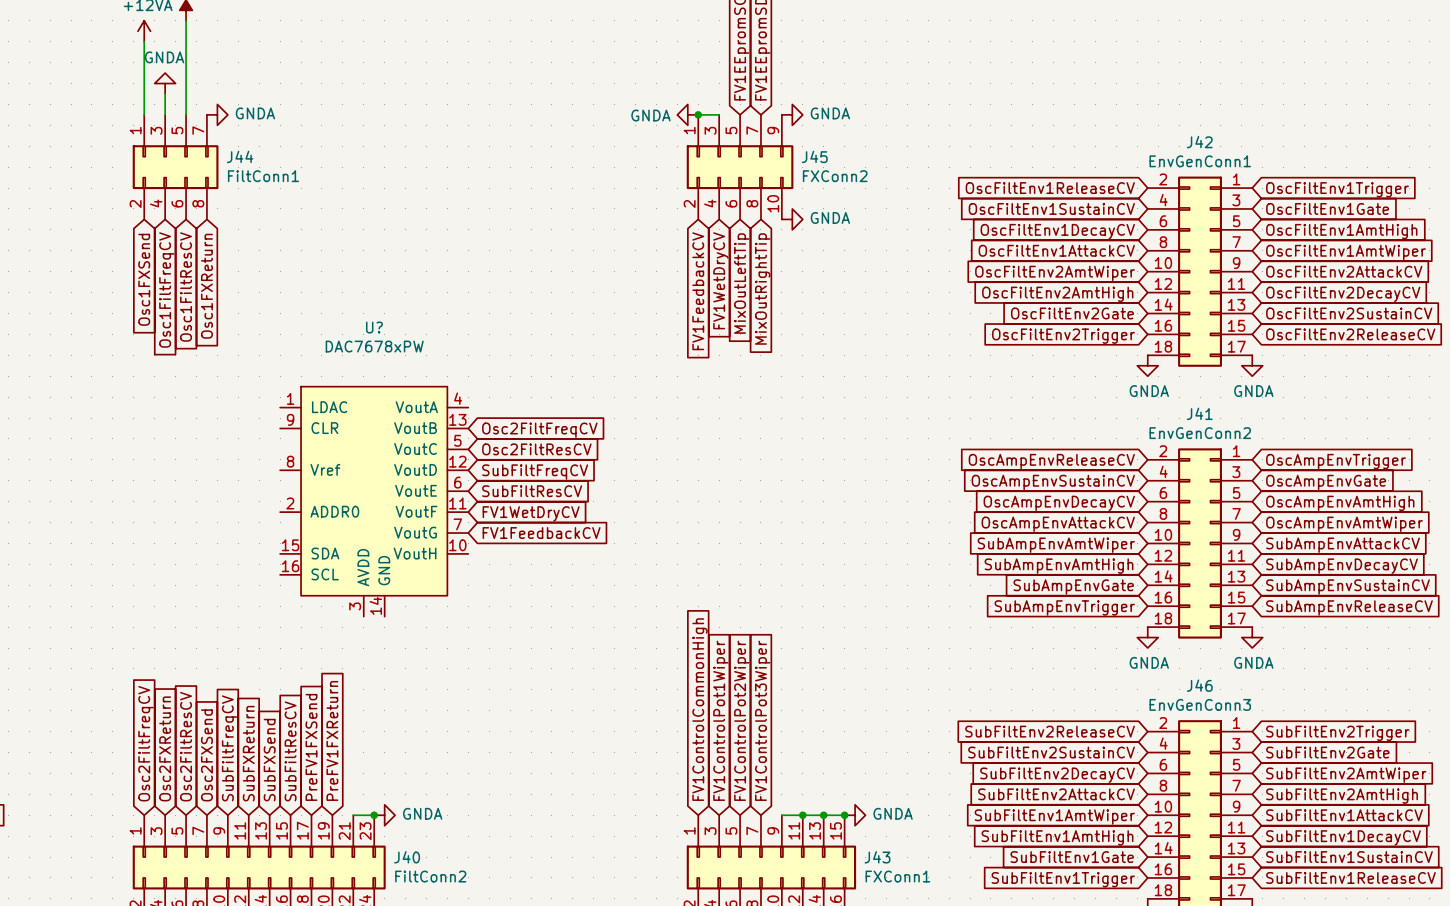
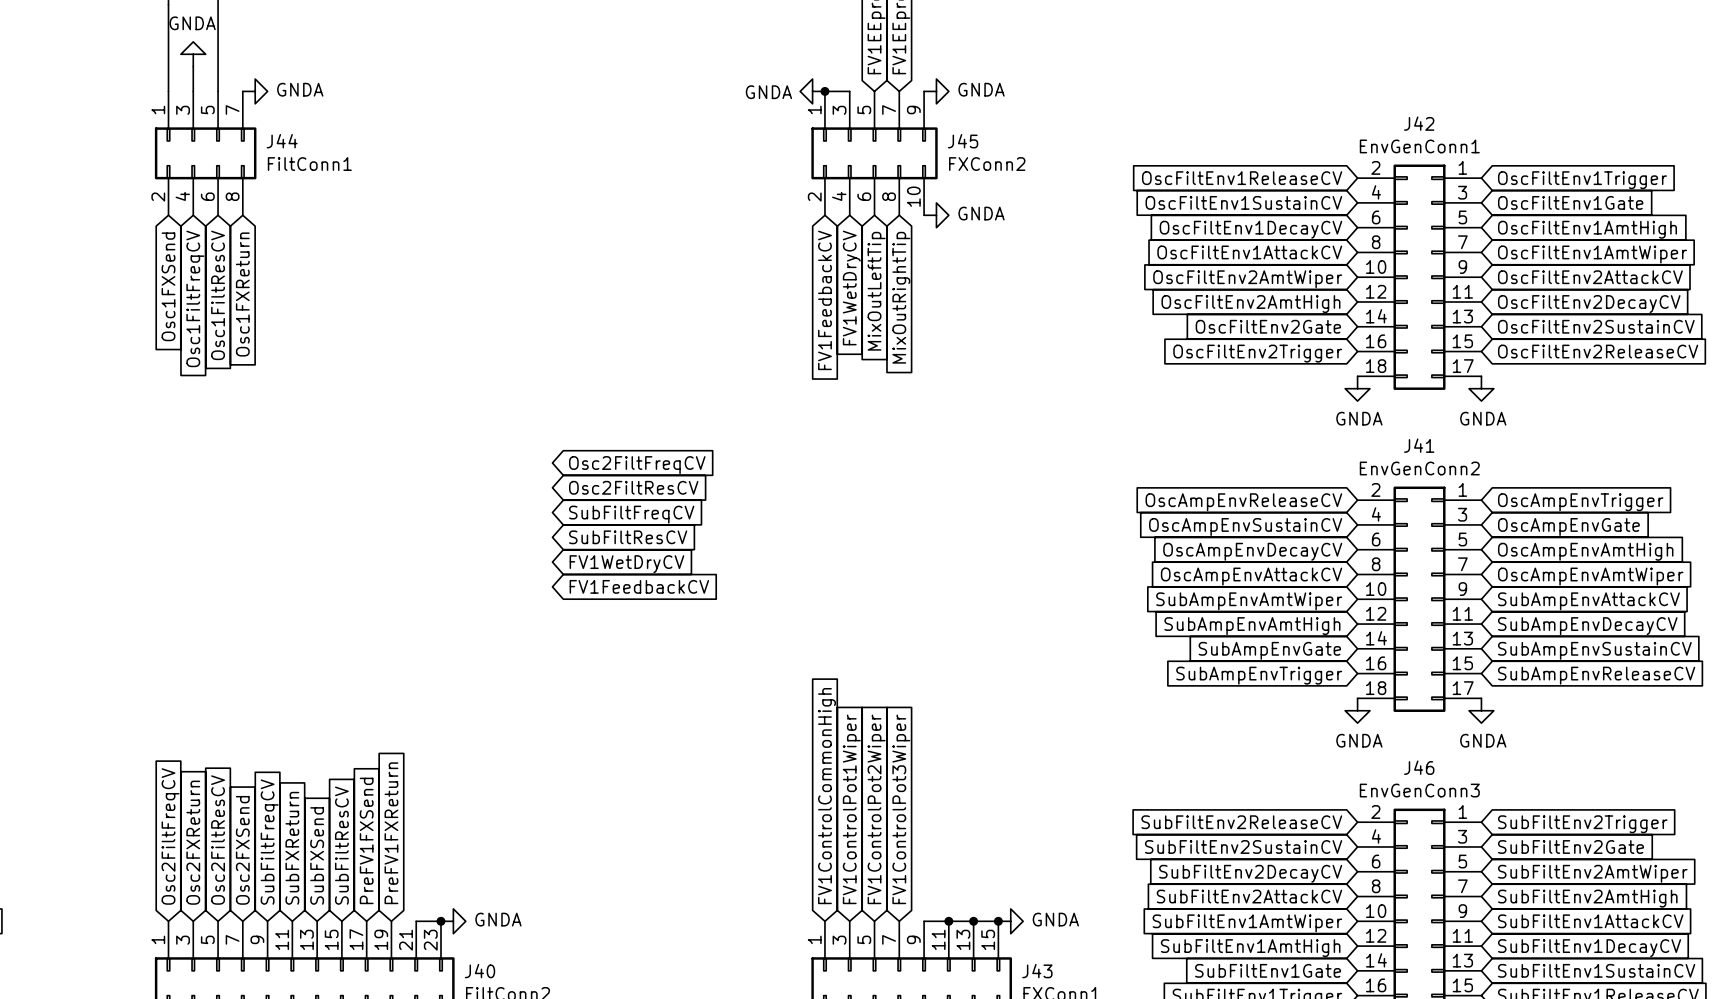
U?: DAC7678xPW (374, 501) -> none

